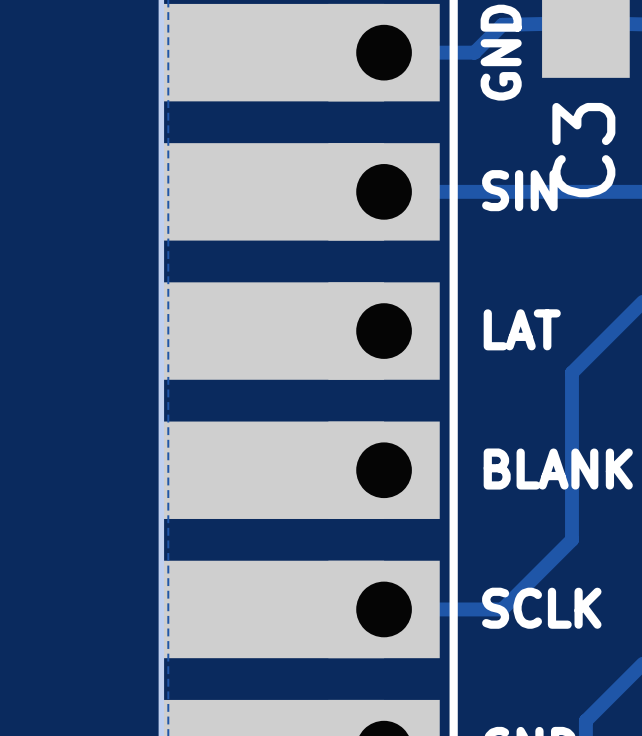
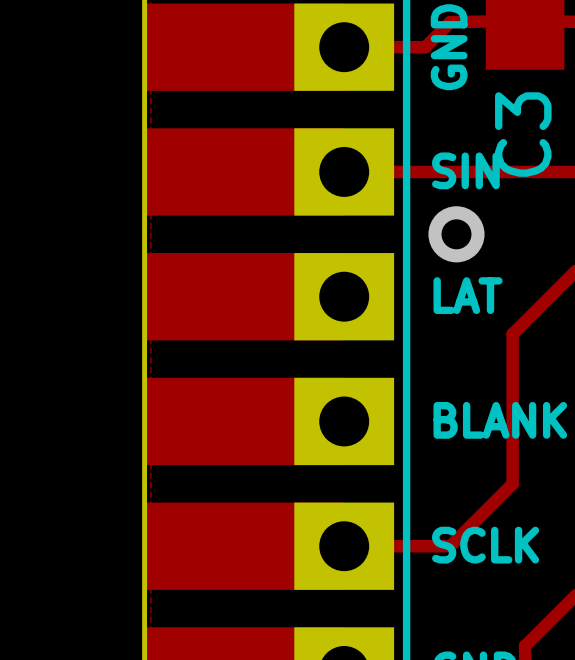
via: none -> (456, 234)

